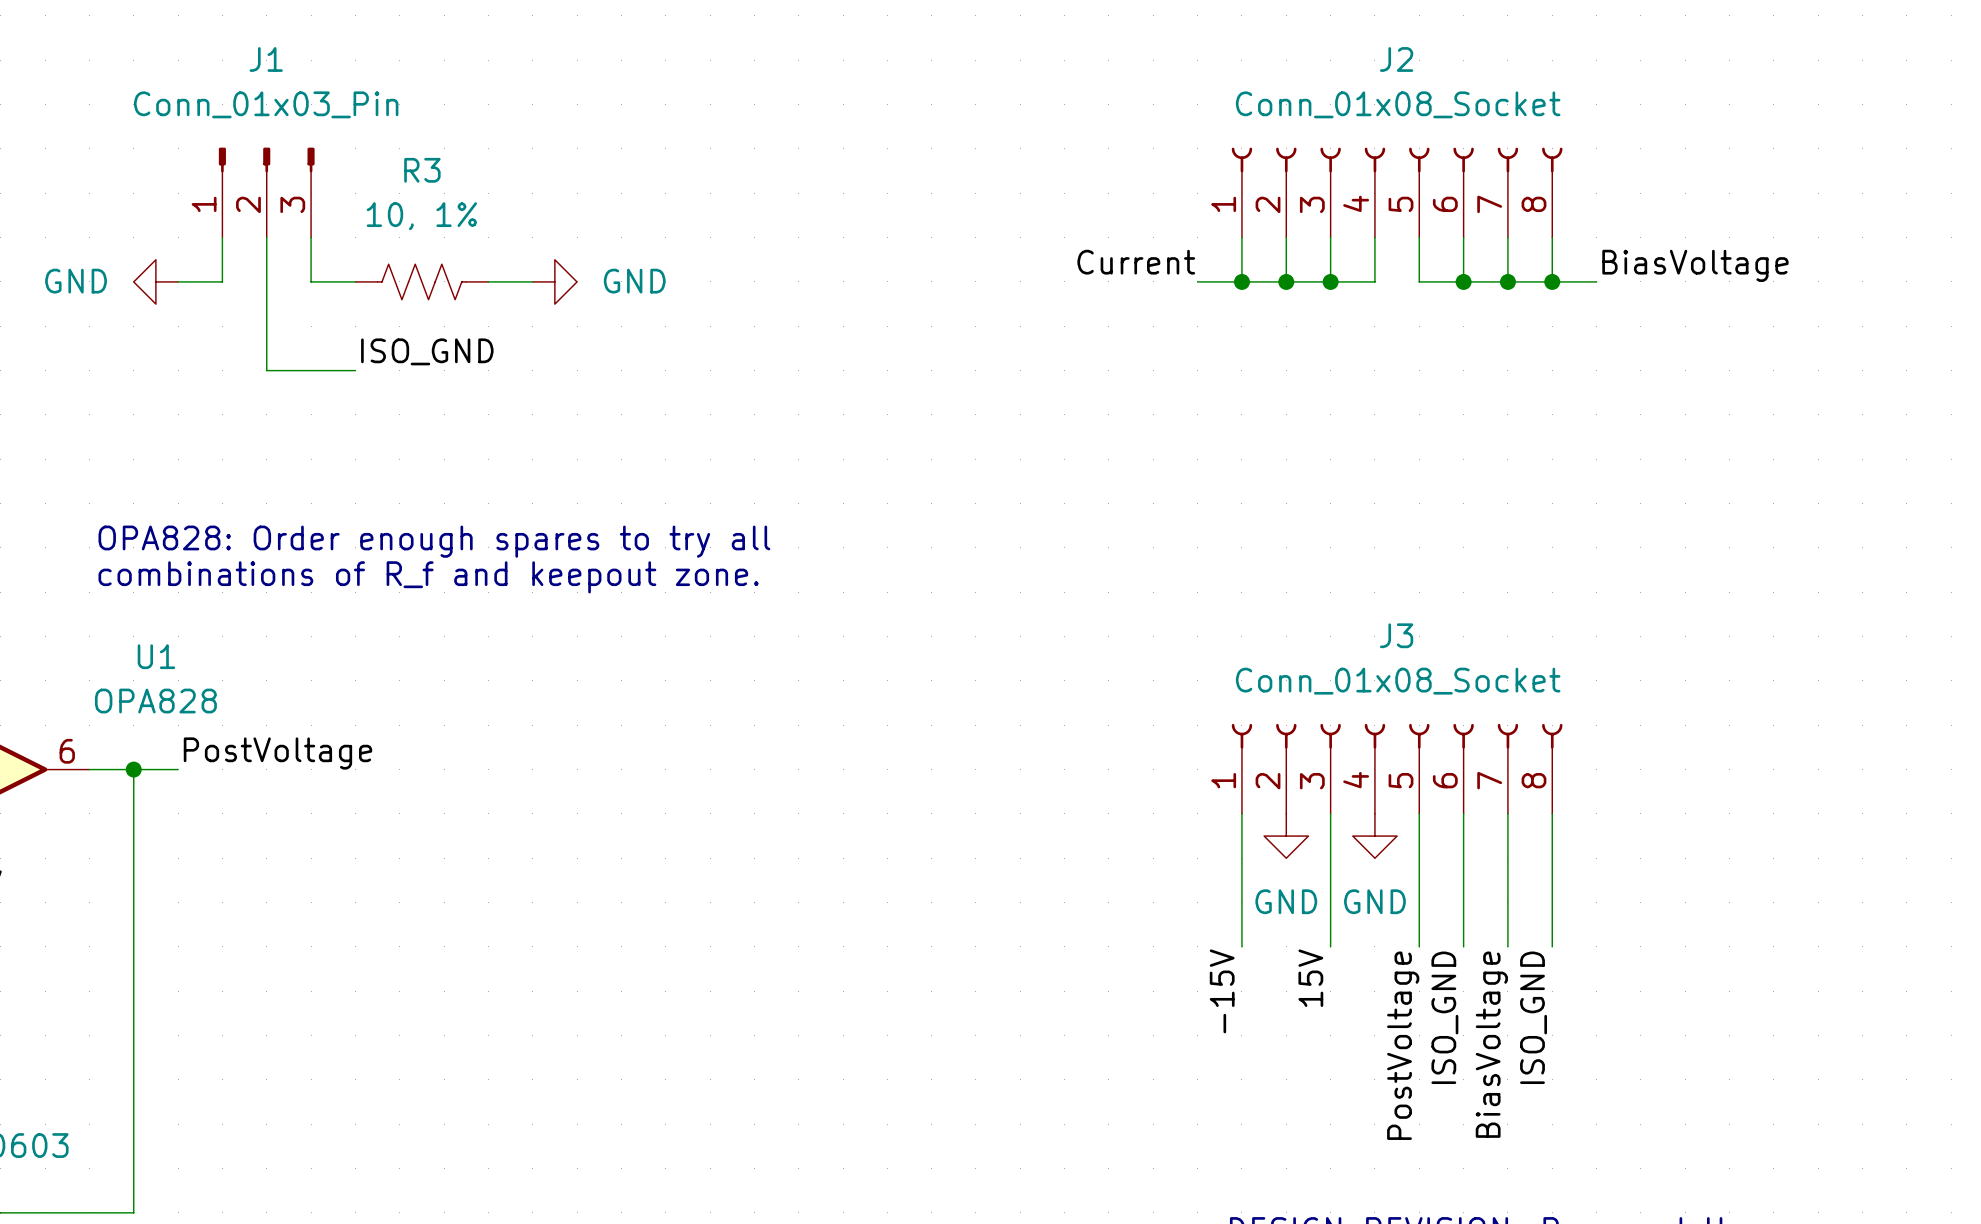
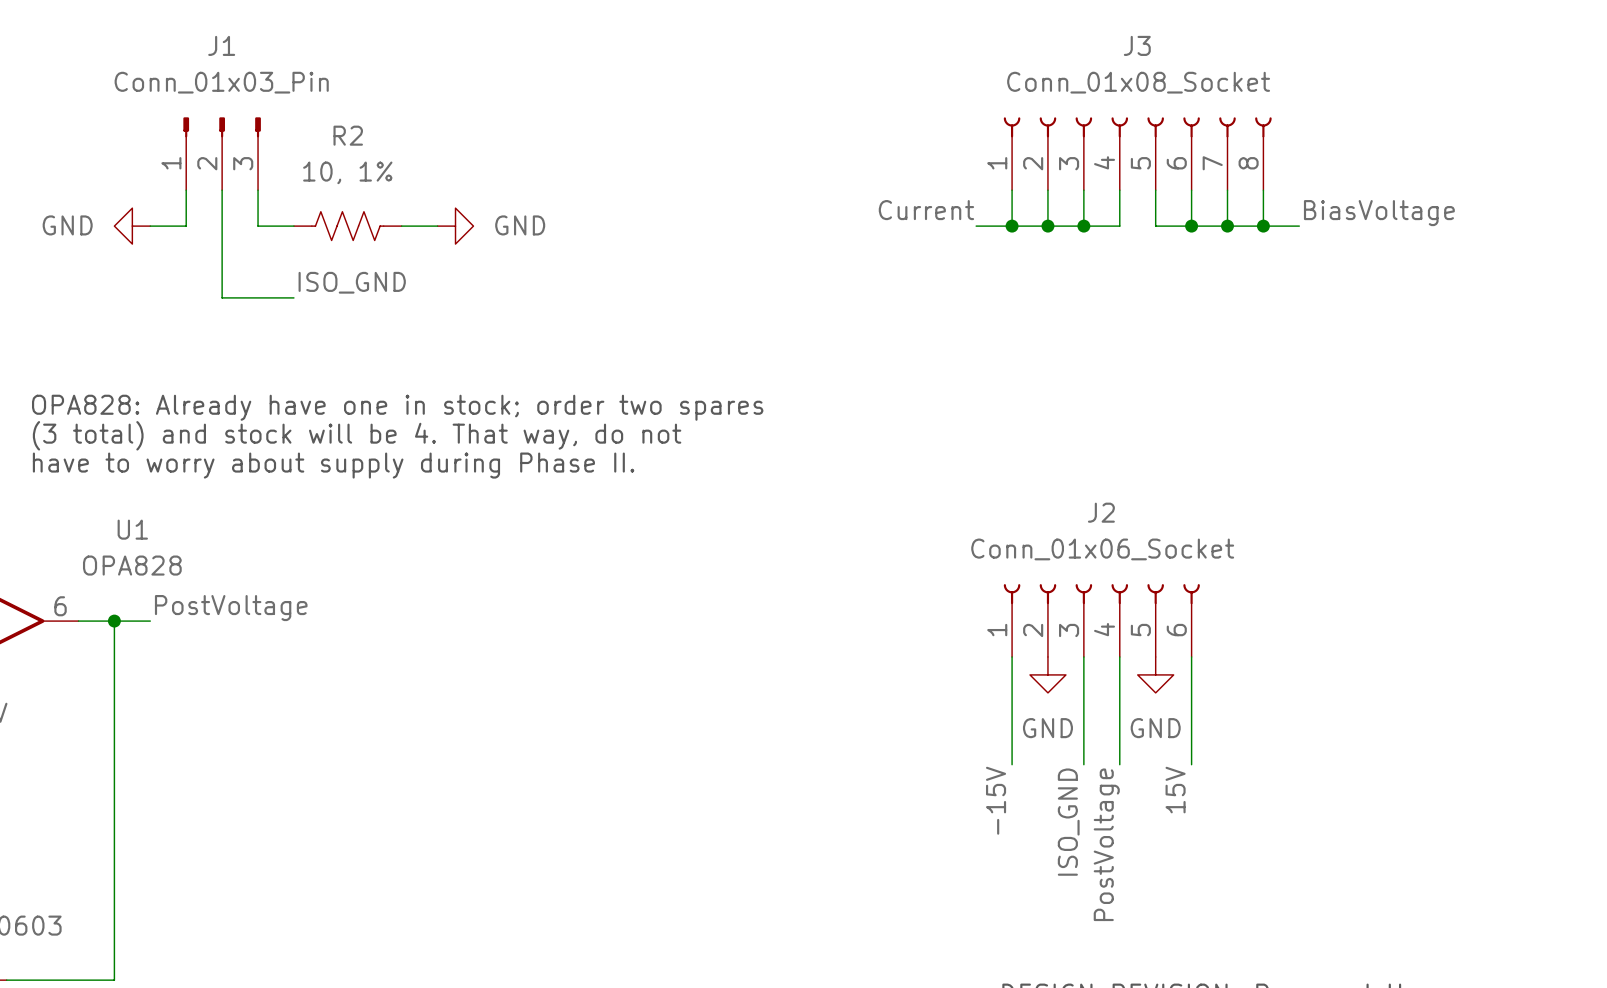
J2 name: J2 (1396, 59) -> J3 (1137, 45)
R3 name: R3 (422, 170) -> R2 (348, 135)
text: none -> OPA828: Already have one in stock; order two spares (397, 407)
text: none -> (3 total) and stock will be 4. That way, do not (357, 435)
text: OPA828: Order enough spares to try all (434, 541) -> none
text: none -> have to worry about supply during Phase II. (333, 465)
text: combinations of R_f and keepout zone. (428, 577) -> none
J2: none -> Conn_01x06_Socket (1101, 620)
J3: Conn_01x08_Socket (1397, 768) -> none
wire: (1419, 813) (1419, 946) -> (1119, 656) (1119, 764)
wire: (1507, 813) (1507, 946) -> none
wire: (1552, 813) (1552, 946) -> none
power symbol position: GND (1374, 836) -> GND (1155, 674)
label: 15V (1310, 978) -> ISO_GND (1068, 822)
label: ISO_GND (1444, 1017) -> 15V (1175, 790)
label: ISO_GND (1533, 1017) -> none
label: BiasVoltage (1491, 1044) -> none
label position: PostVoltage (1403, 1045) -> PostVoltage (1106, 844)

